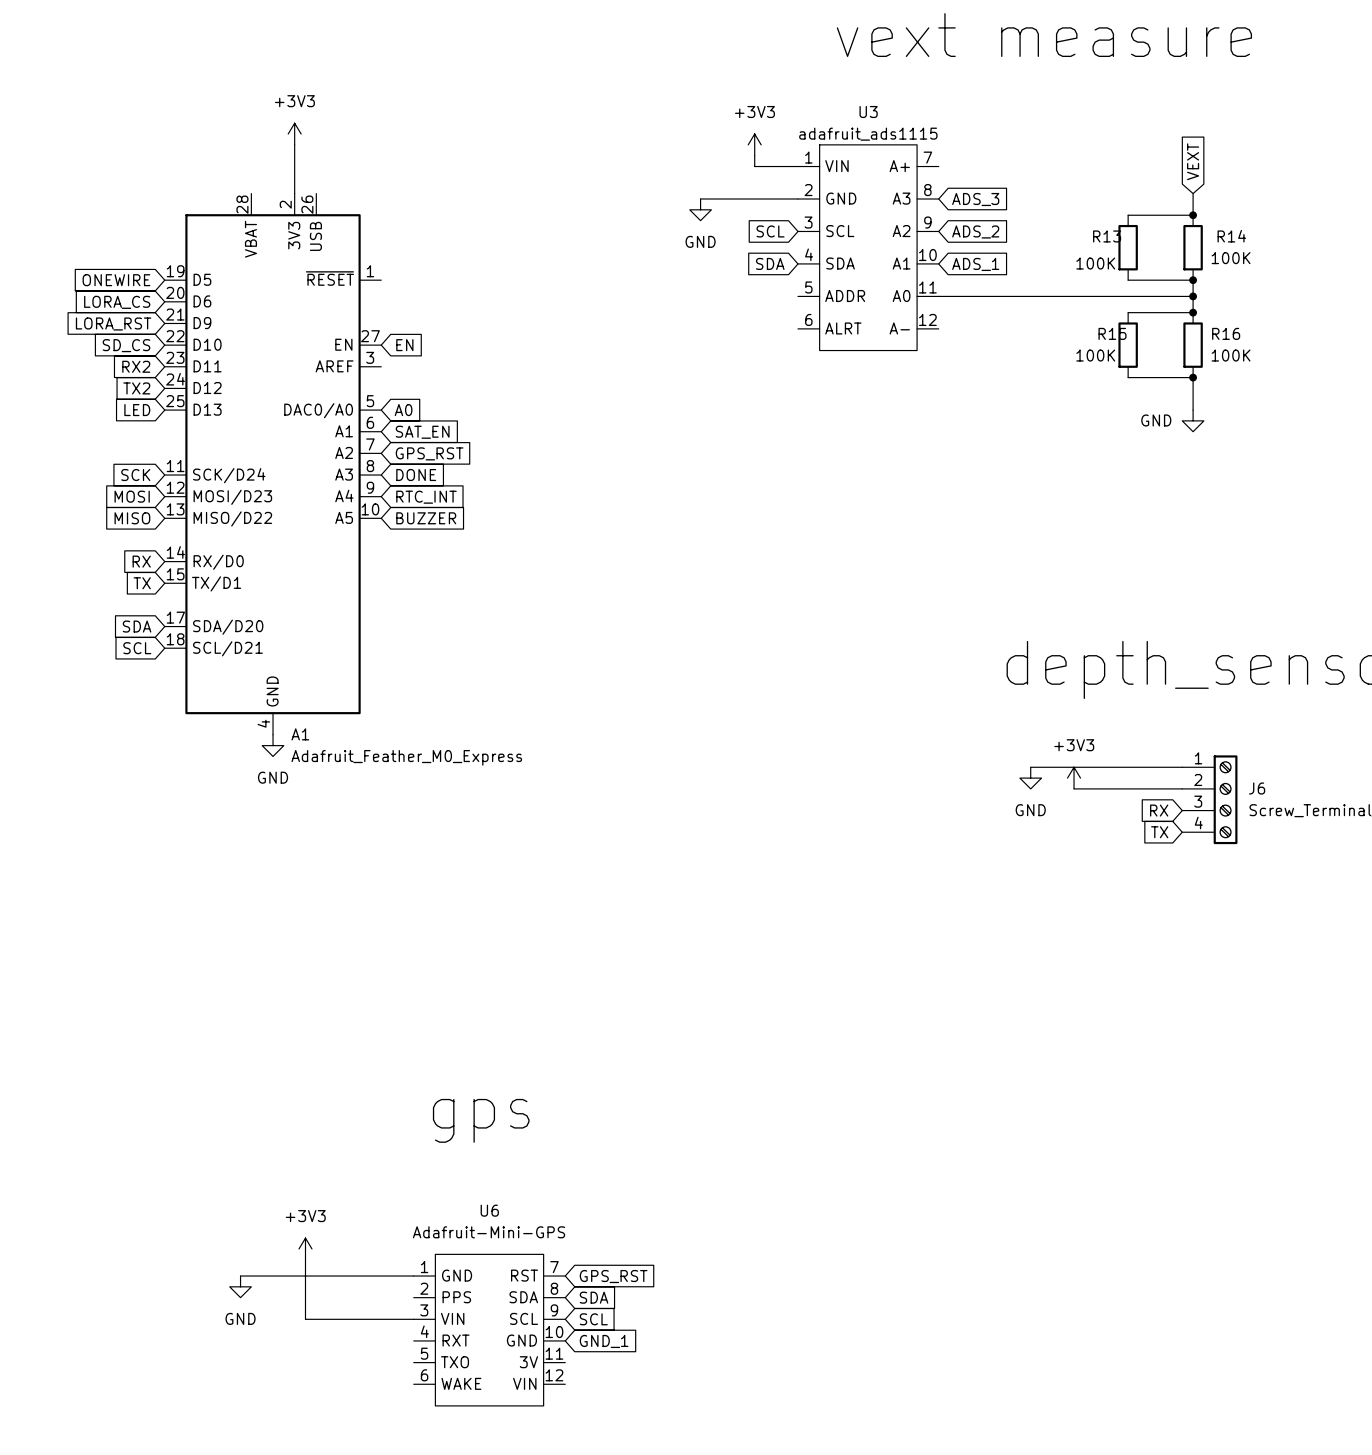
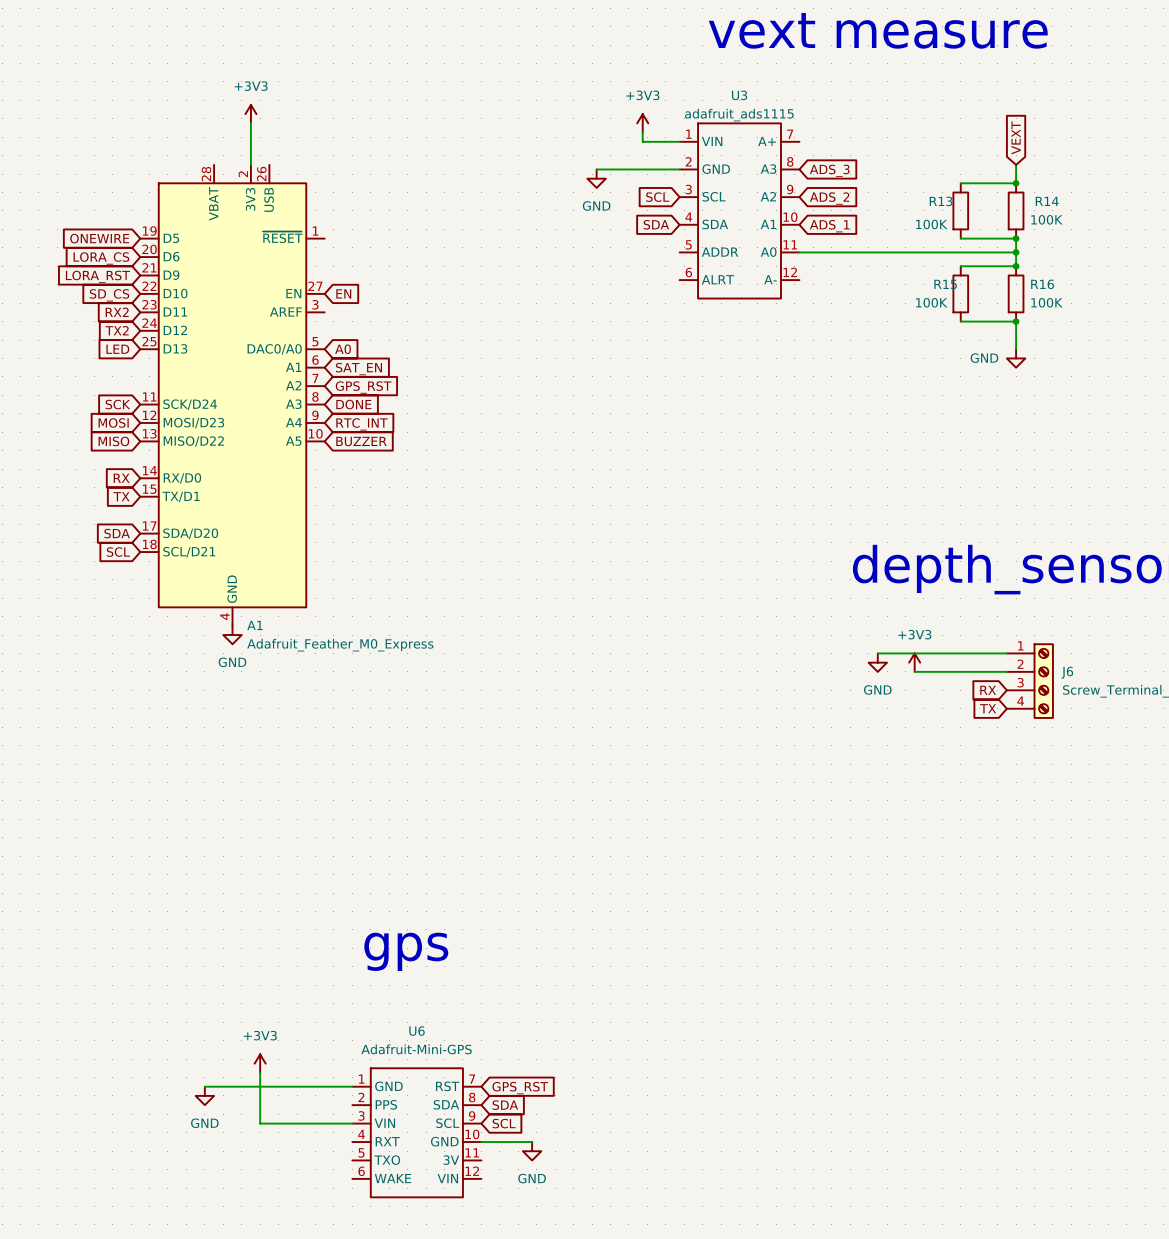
wire: none -> (481, 1142) (532, 1142)
global label: GND_1 (604, 1341) -> none
power symbol: none -> GND (532, 1151)

